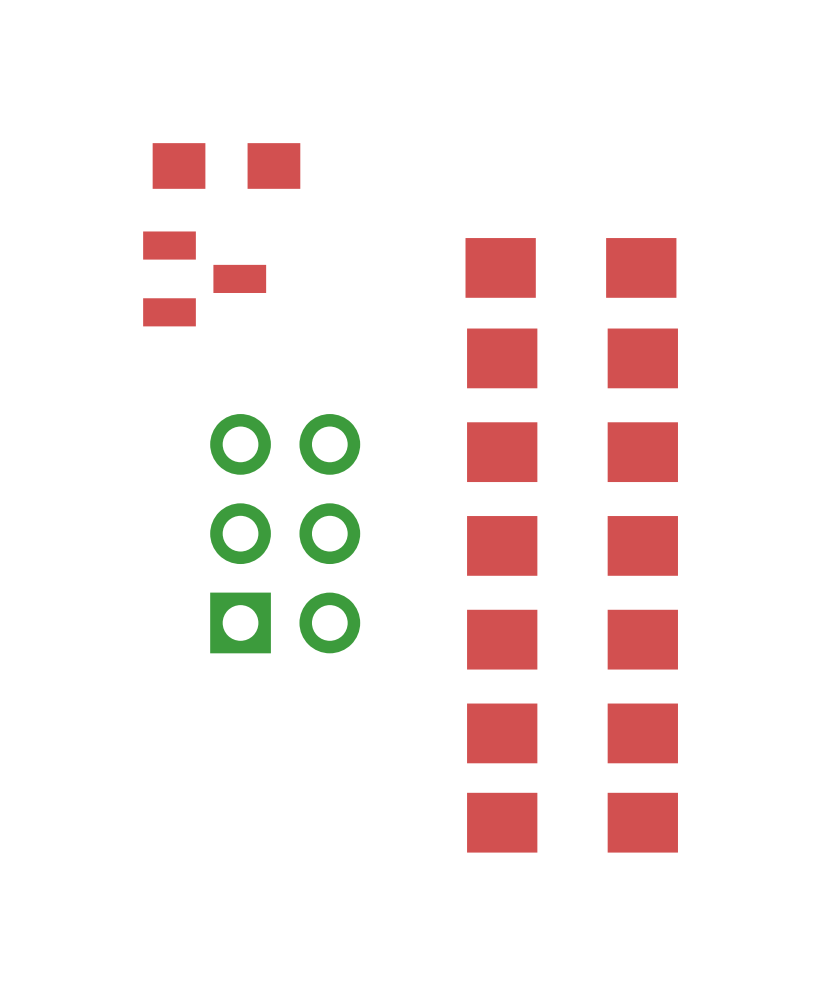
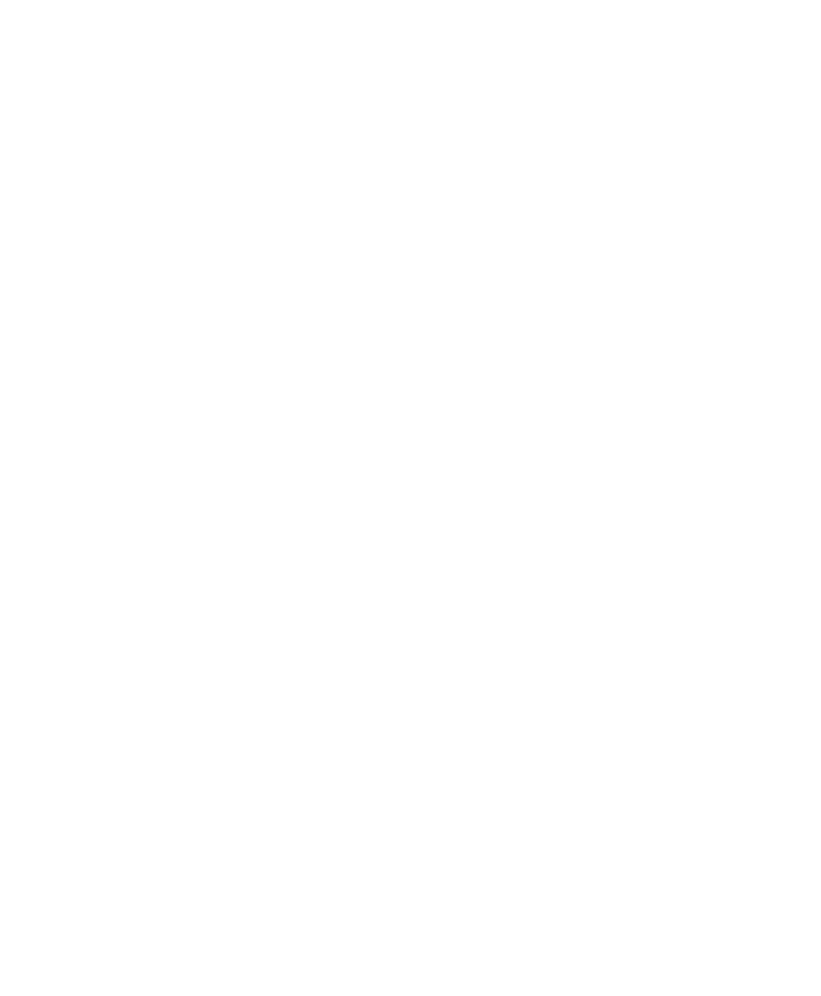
part: (226, 165) -> none
part: (570, 267) -> none
part: (204, 278) -> none
part: (572, 358) -> none
part: (572, 452) -> none
part: (285, 533) -> none
part: (572, 545) -> none
part: (572, 639) -> none
part: (572, 733) -> none
part: (572, 822) -> none

